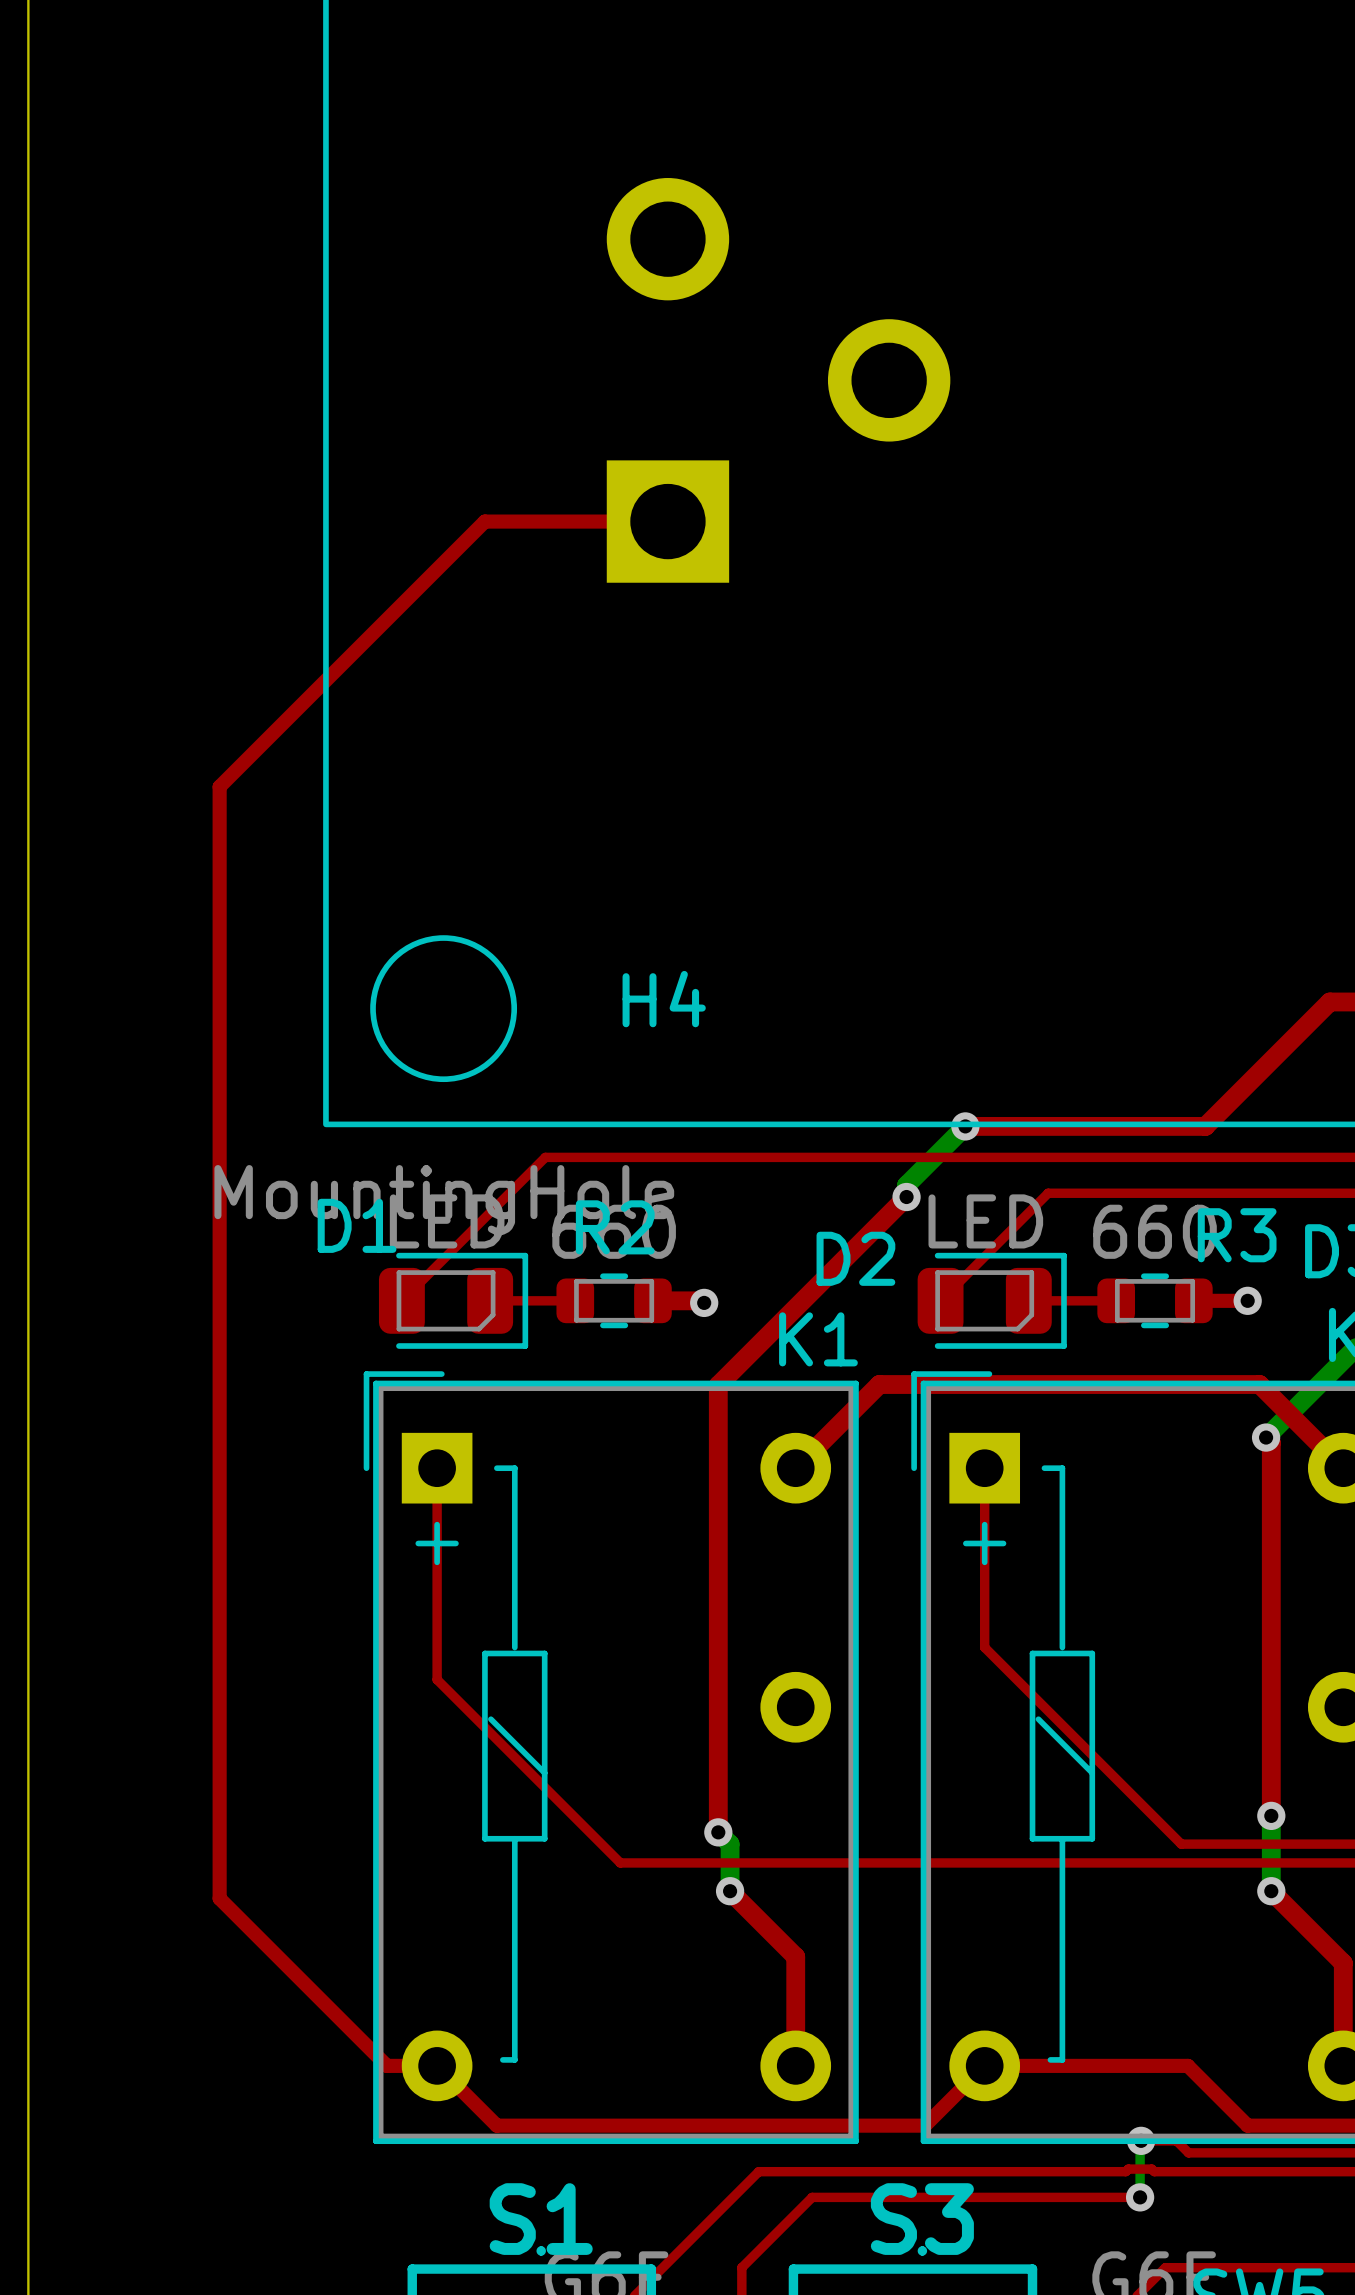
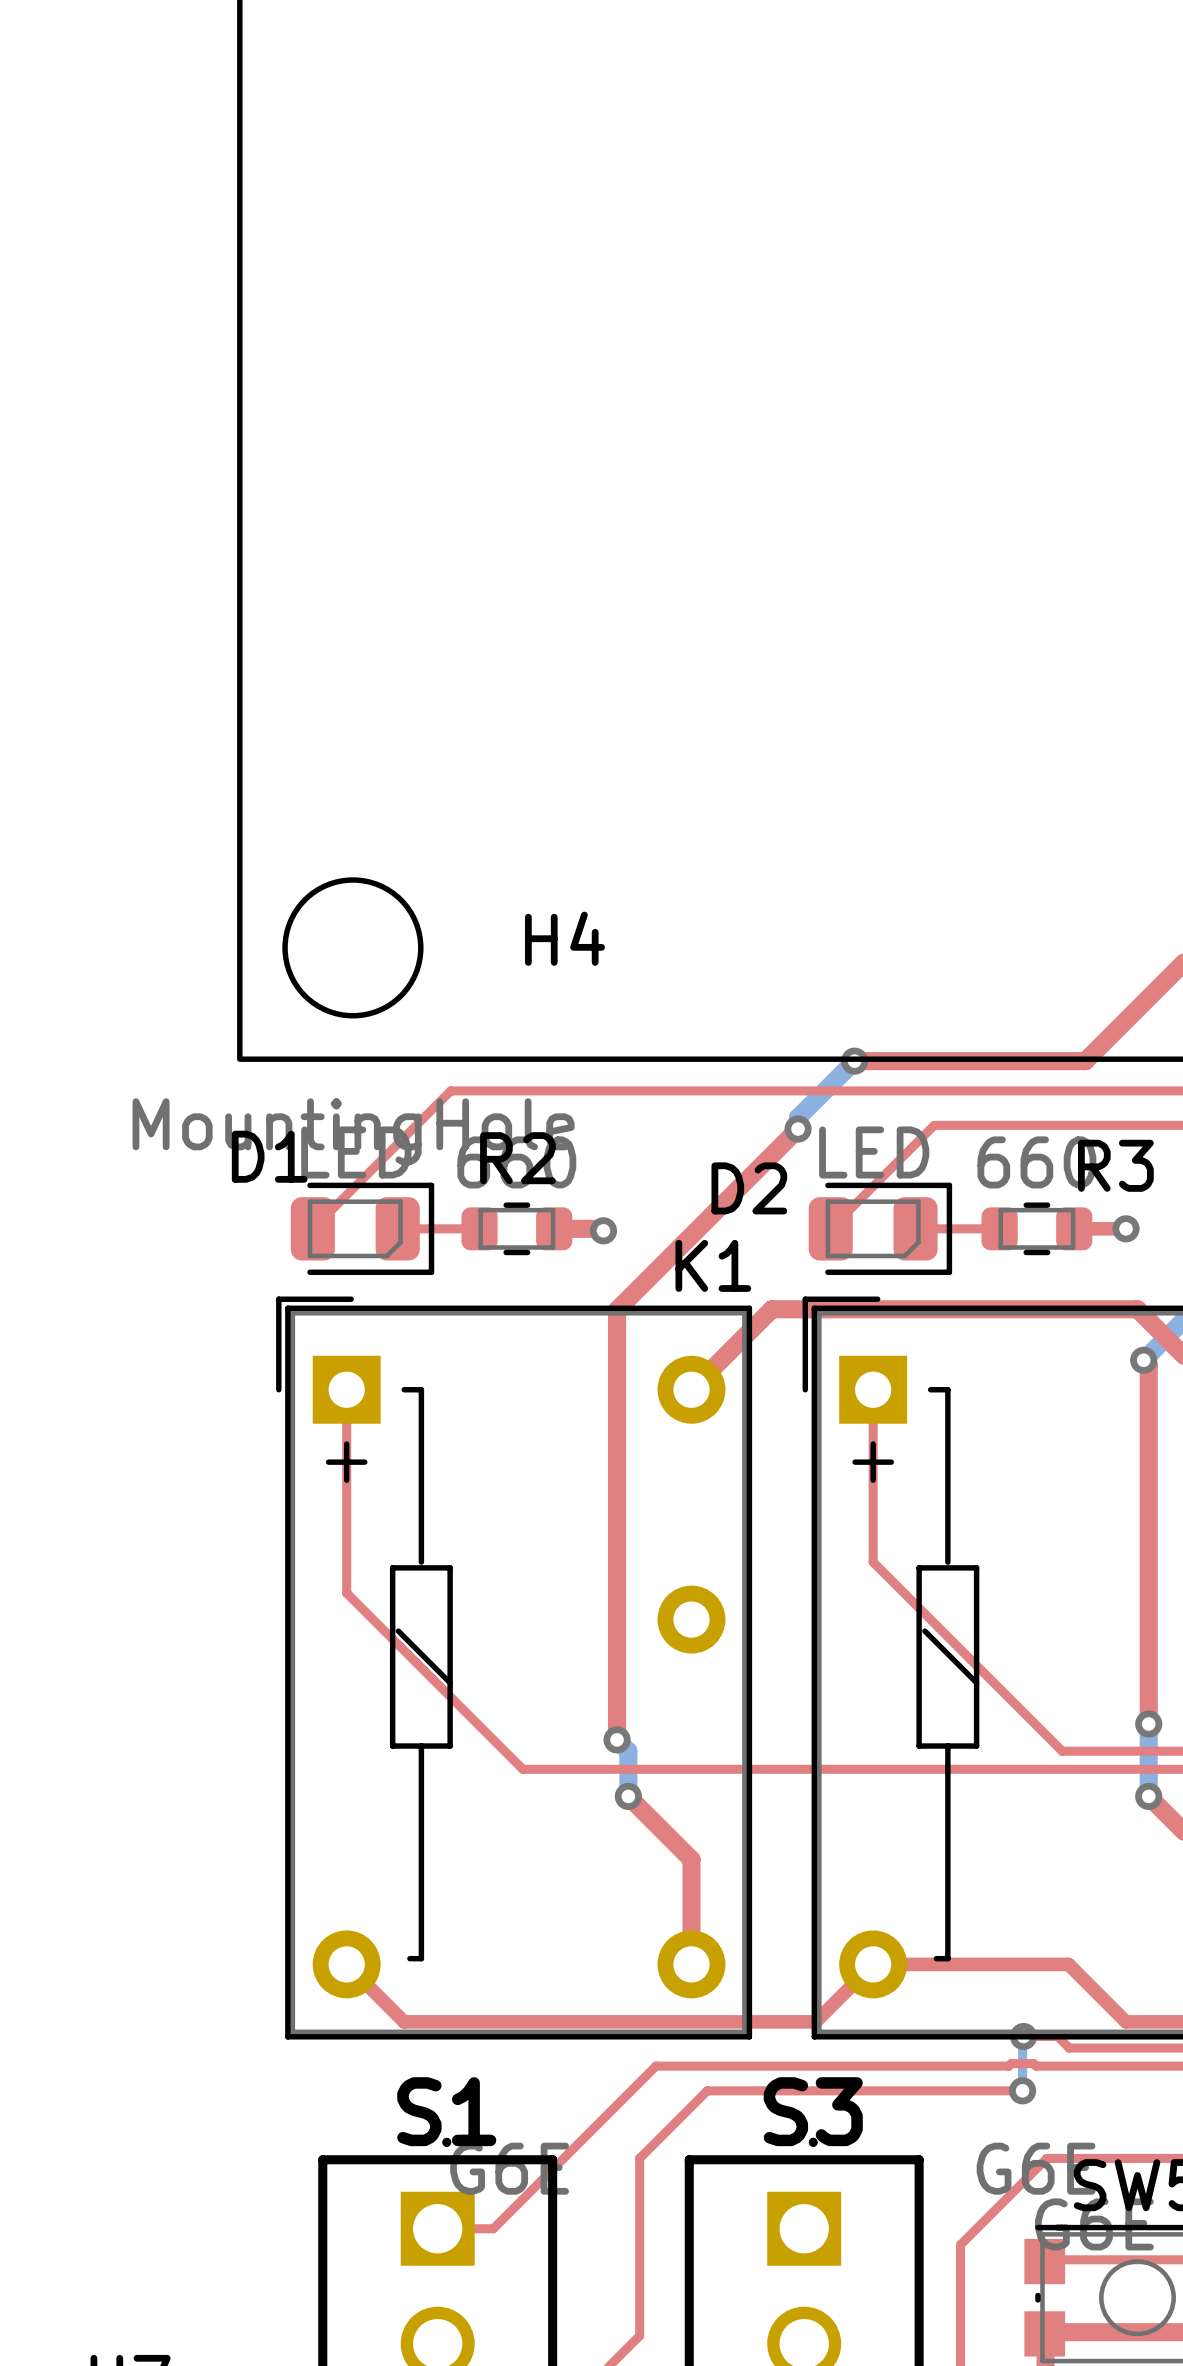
part: (778, 380) -> none
top track: (667, 521) (484, 521) (219, 786) (219, 1898) (386, 2065) (437, 2065) -> none

